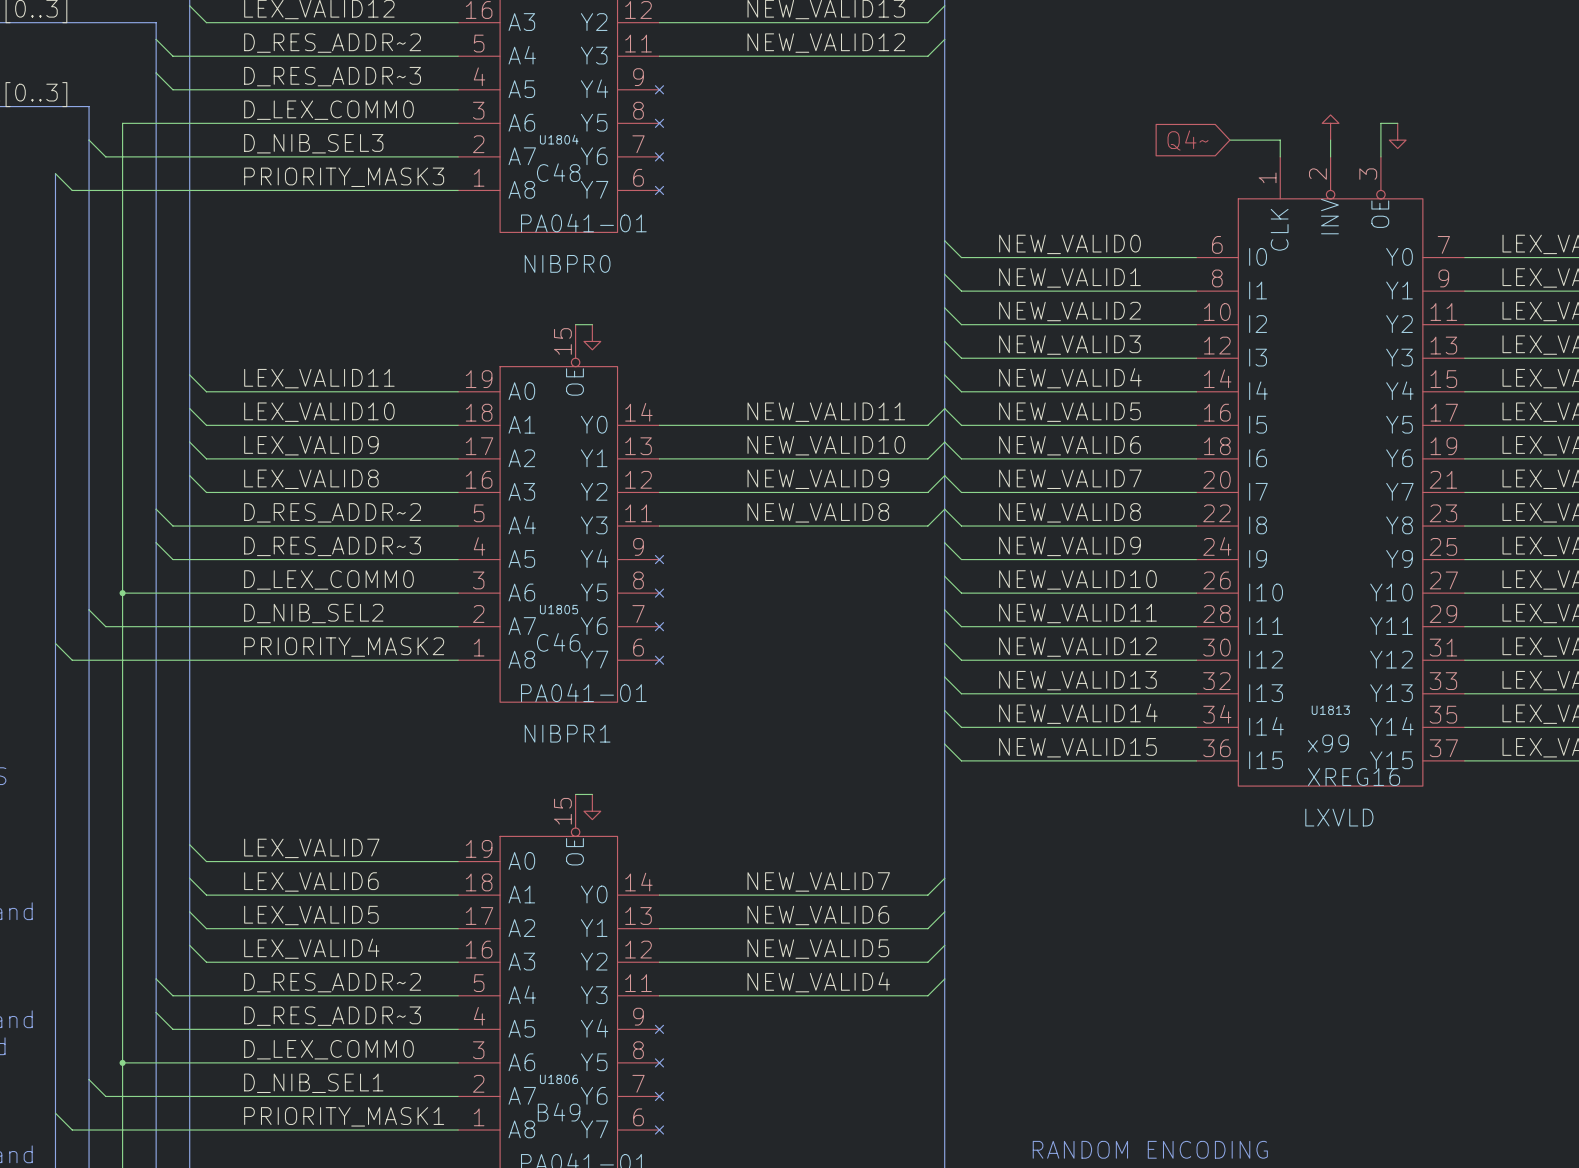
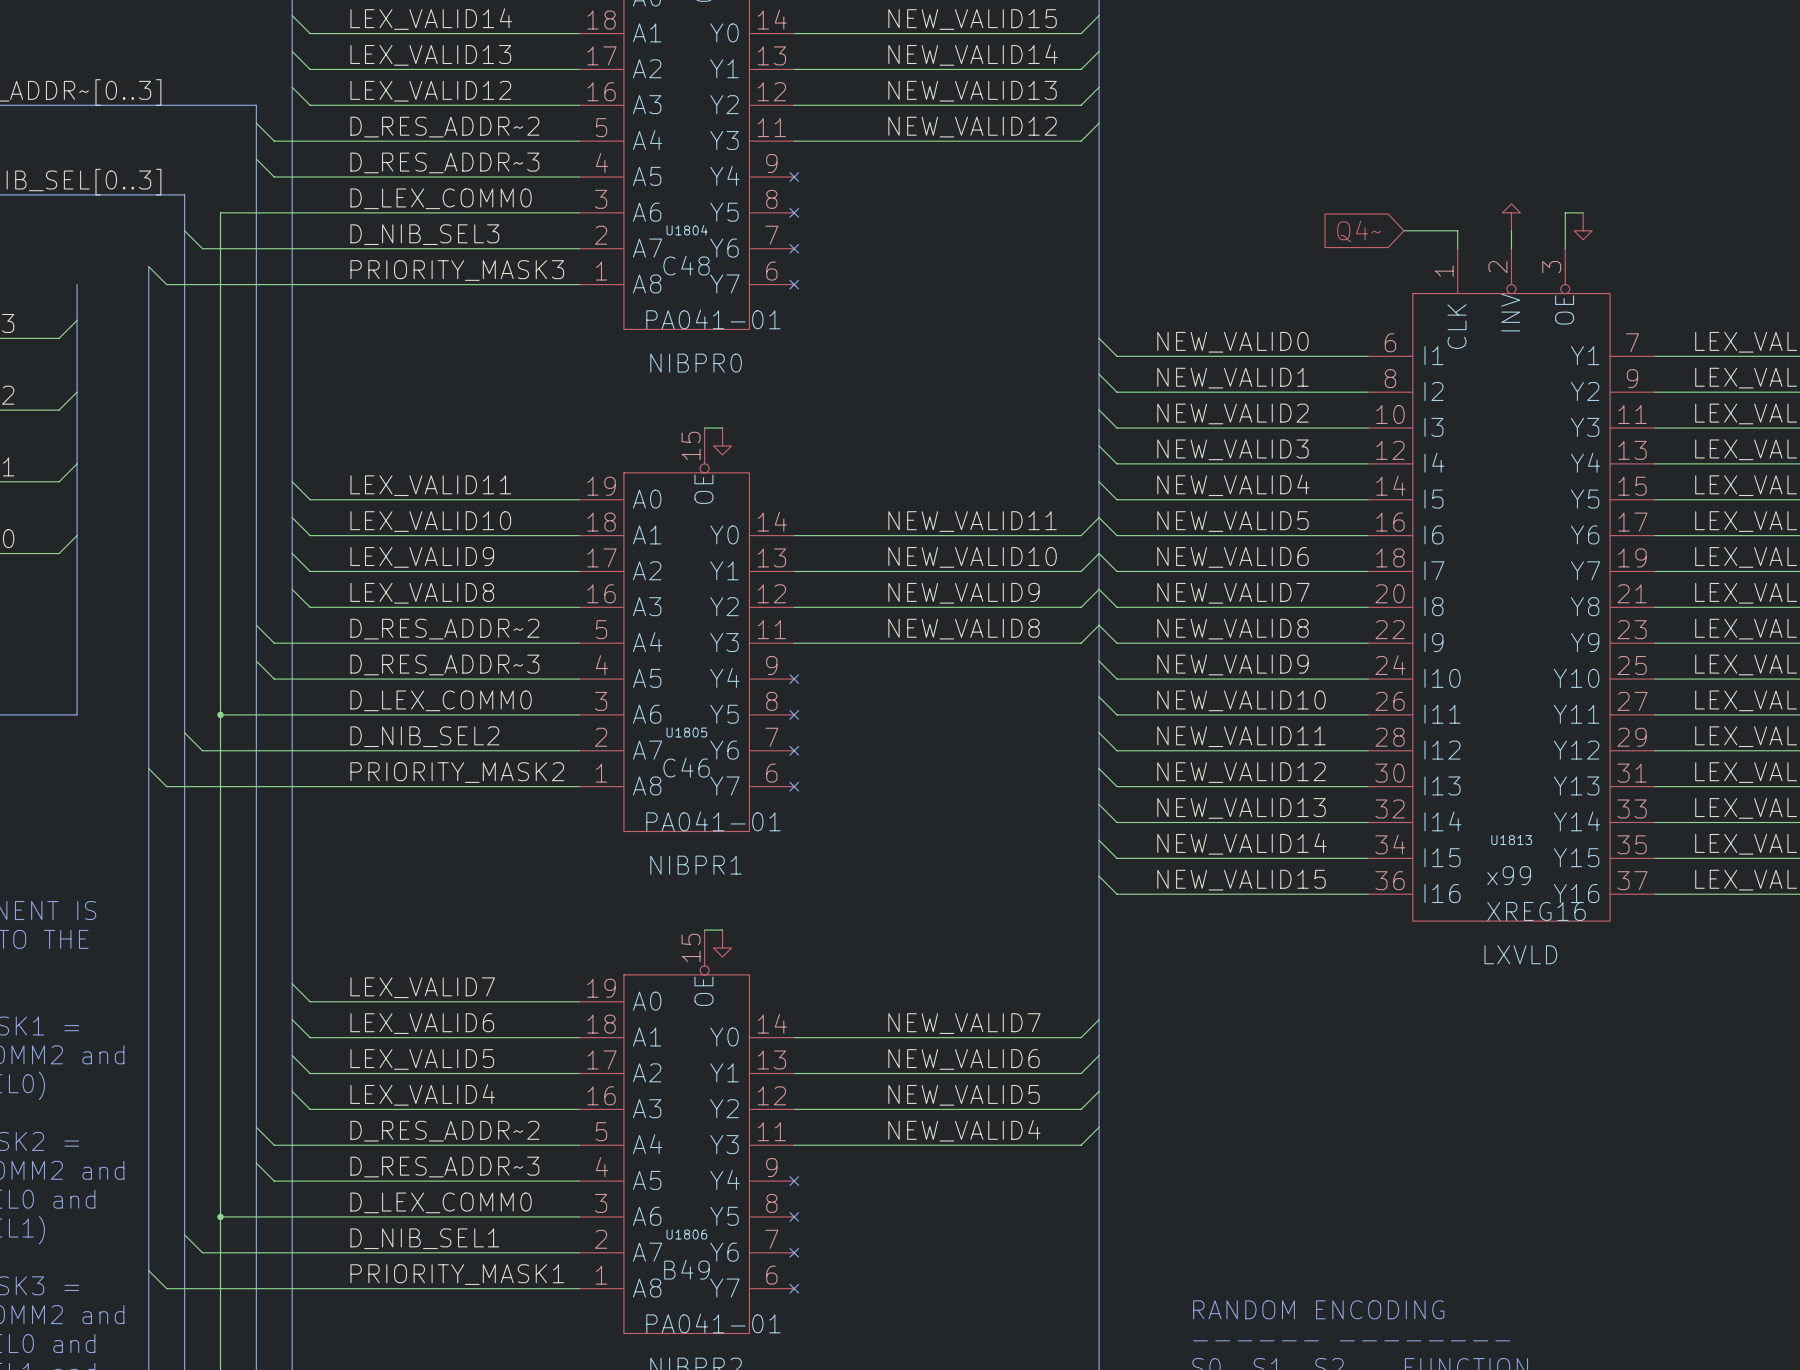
U1813 symbol: [1196, 156, 1465, 787] -> [1368, 248, 1655, 922]

